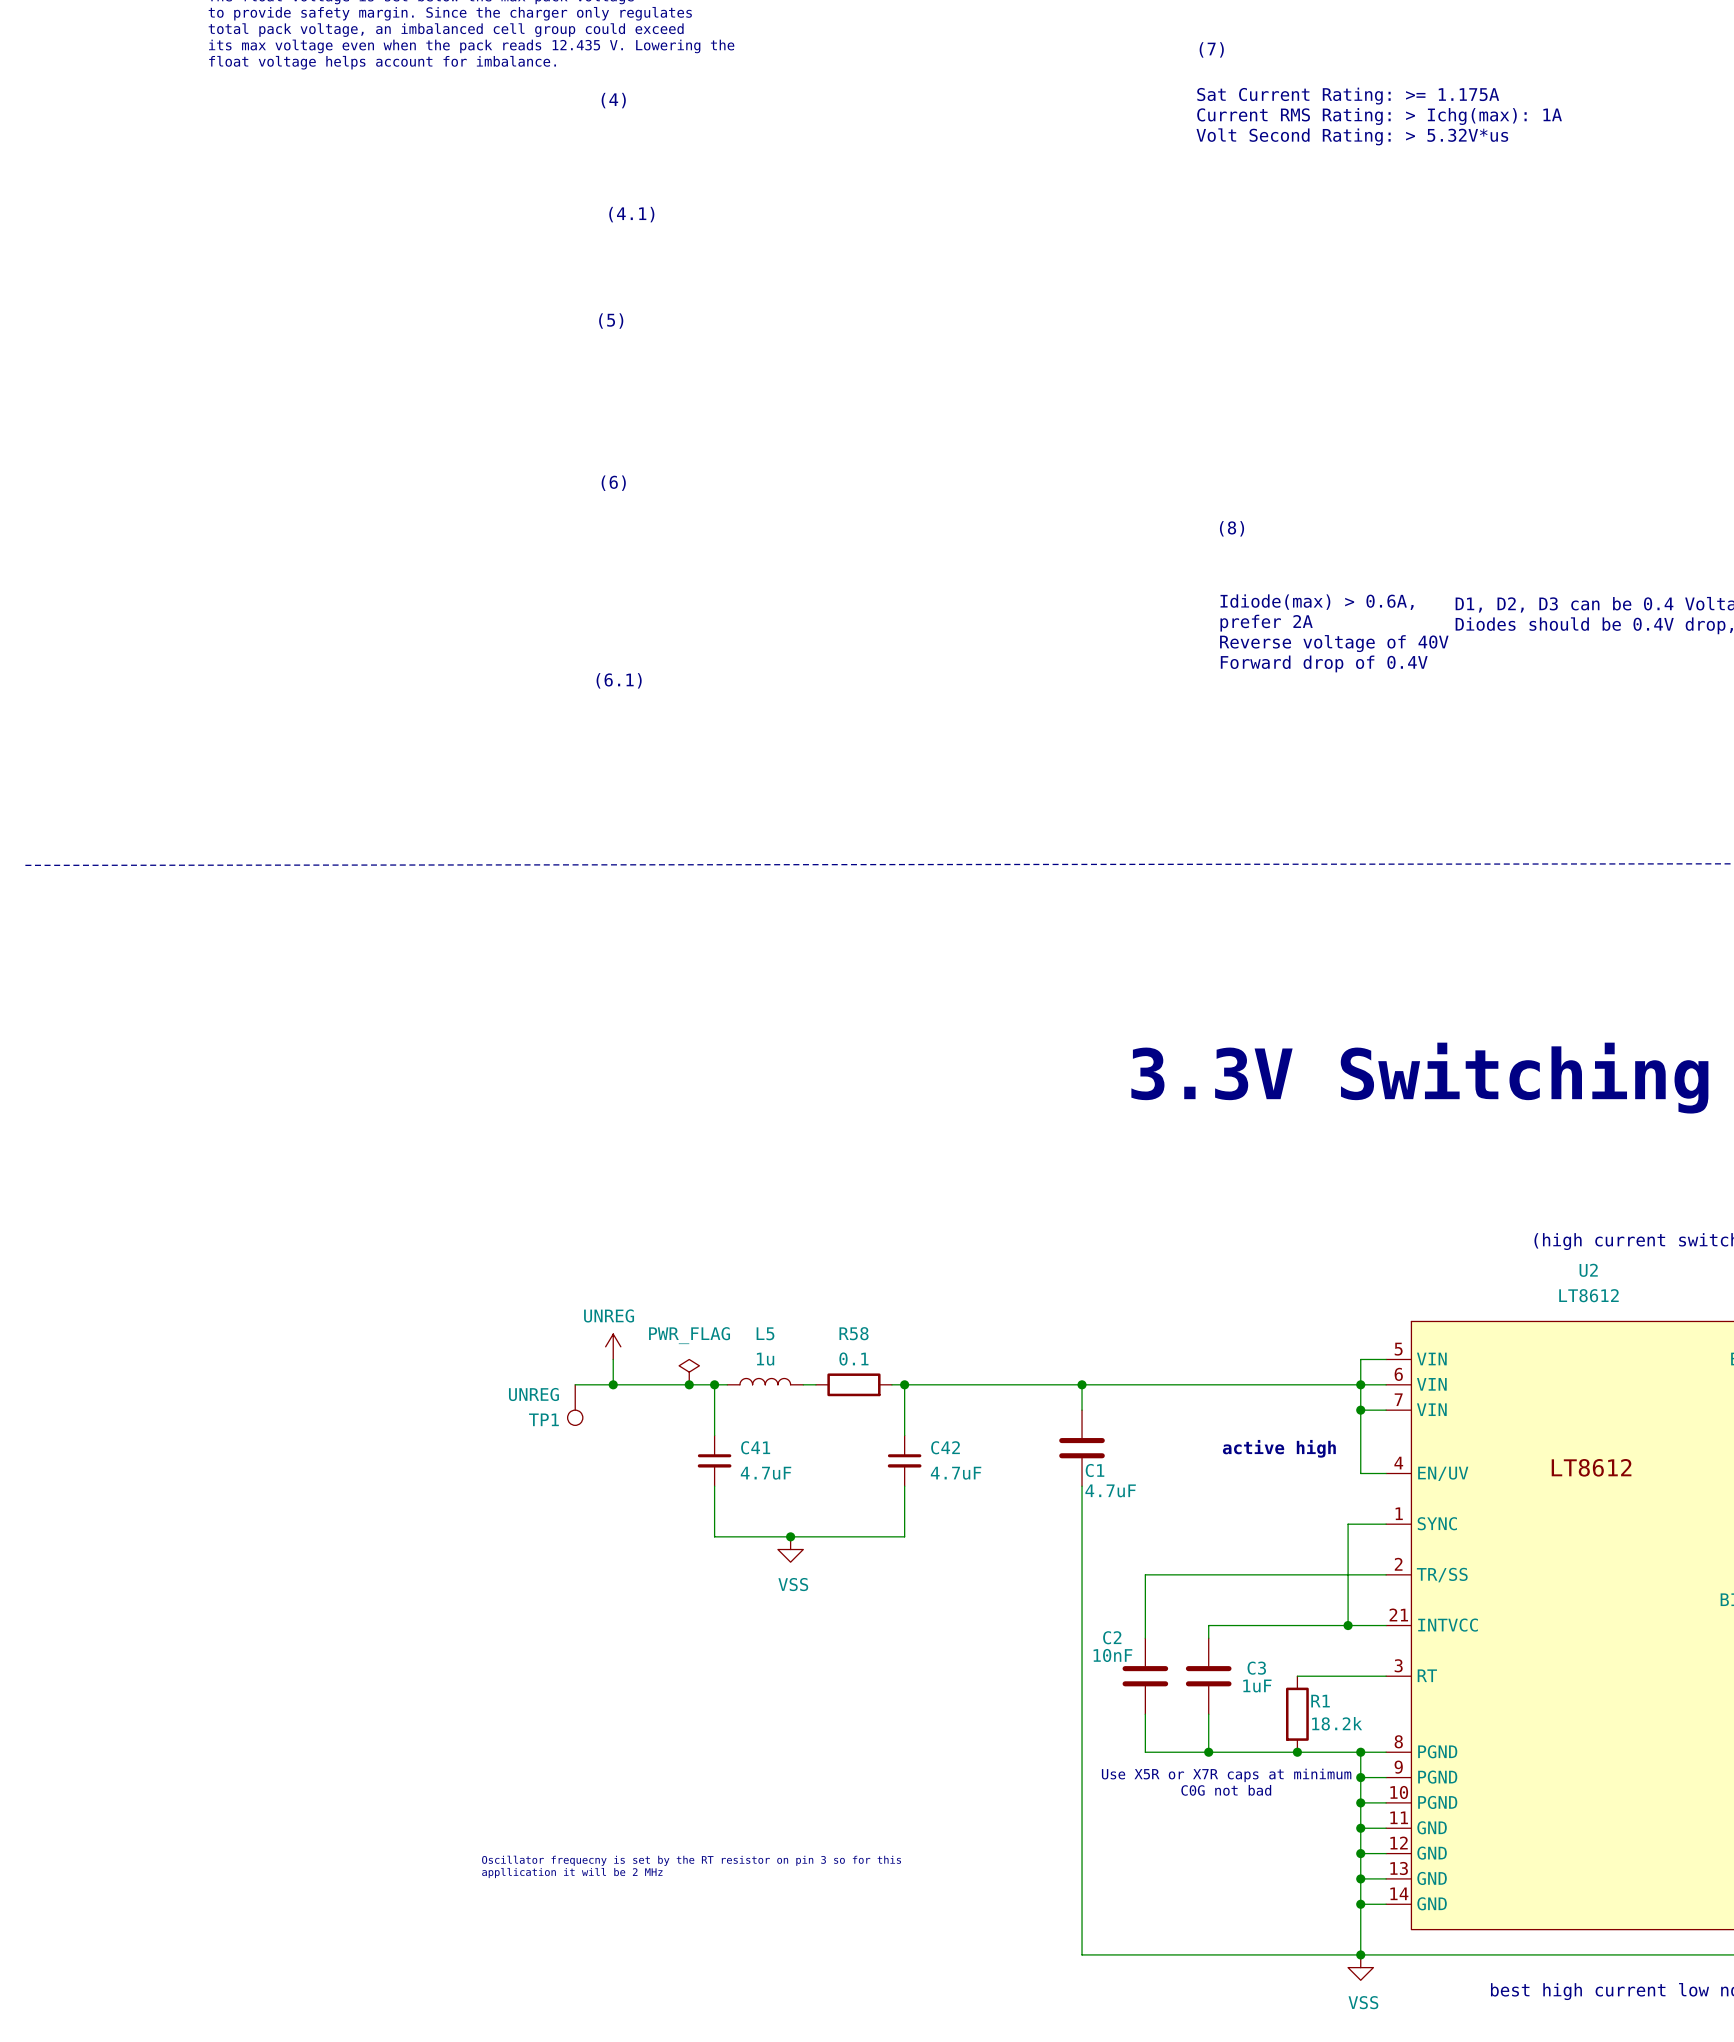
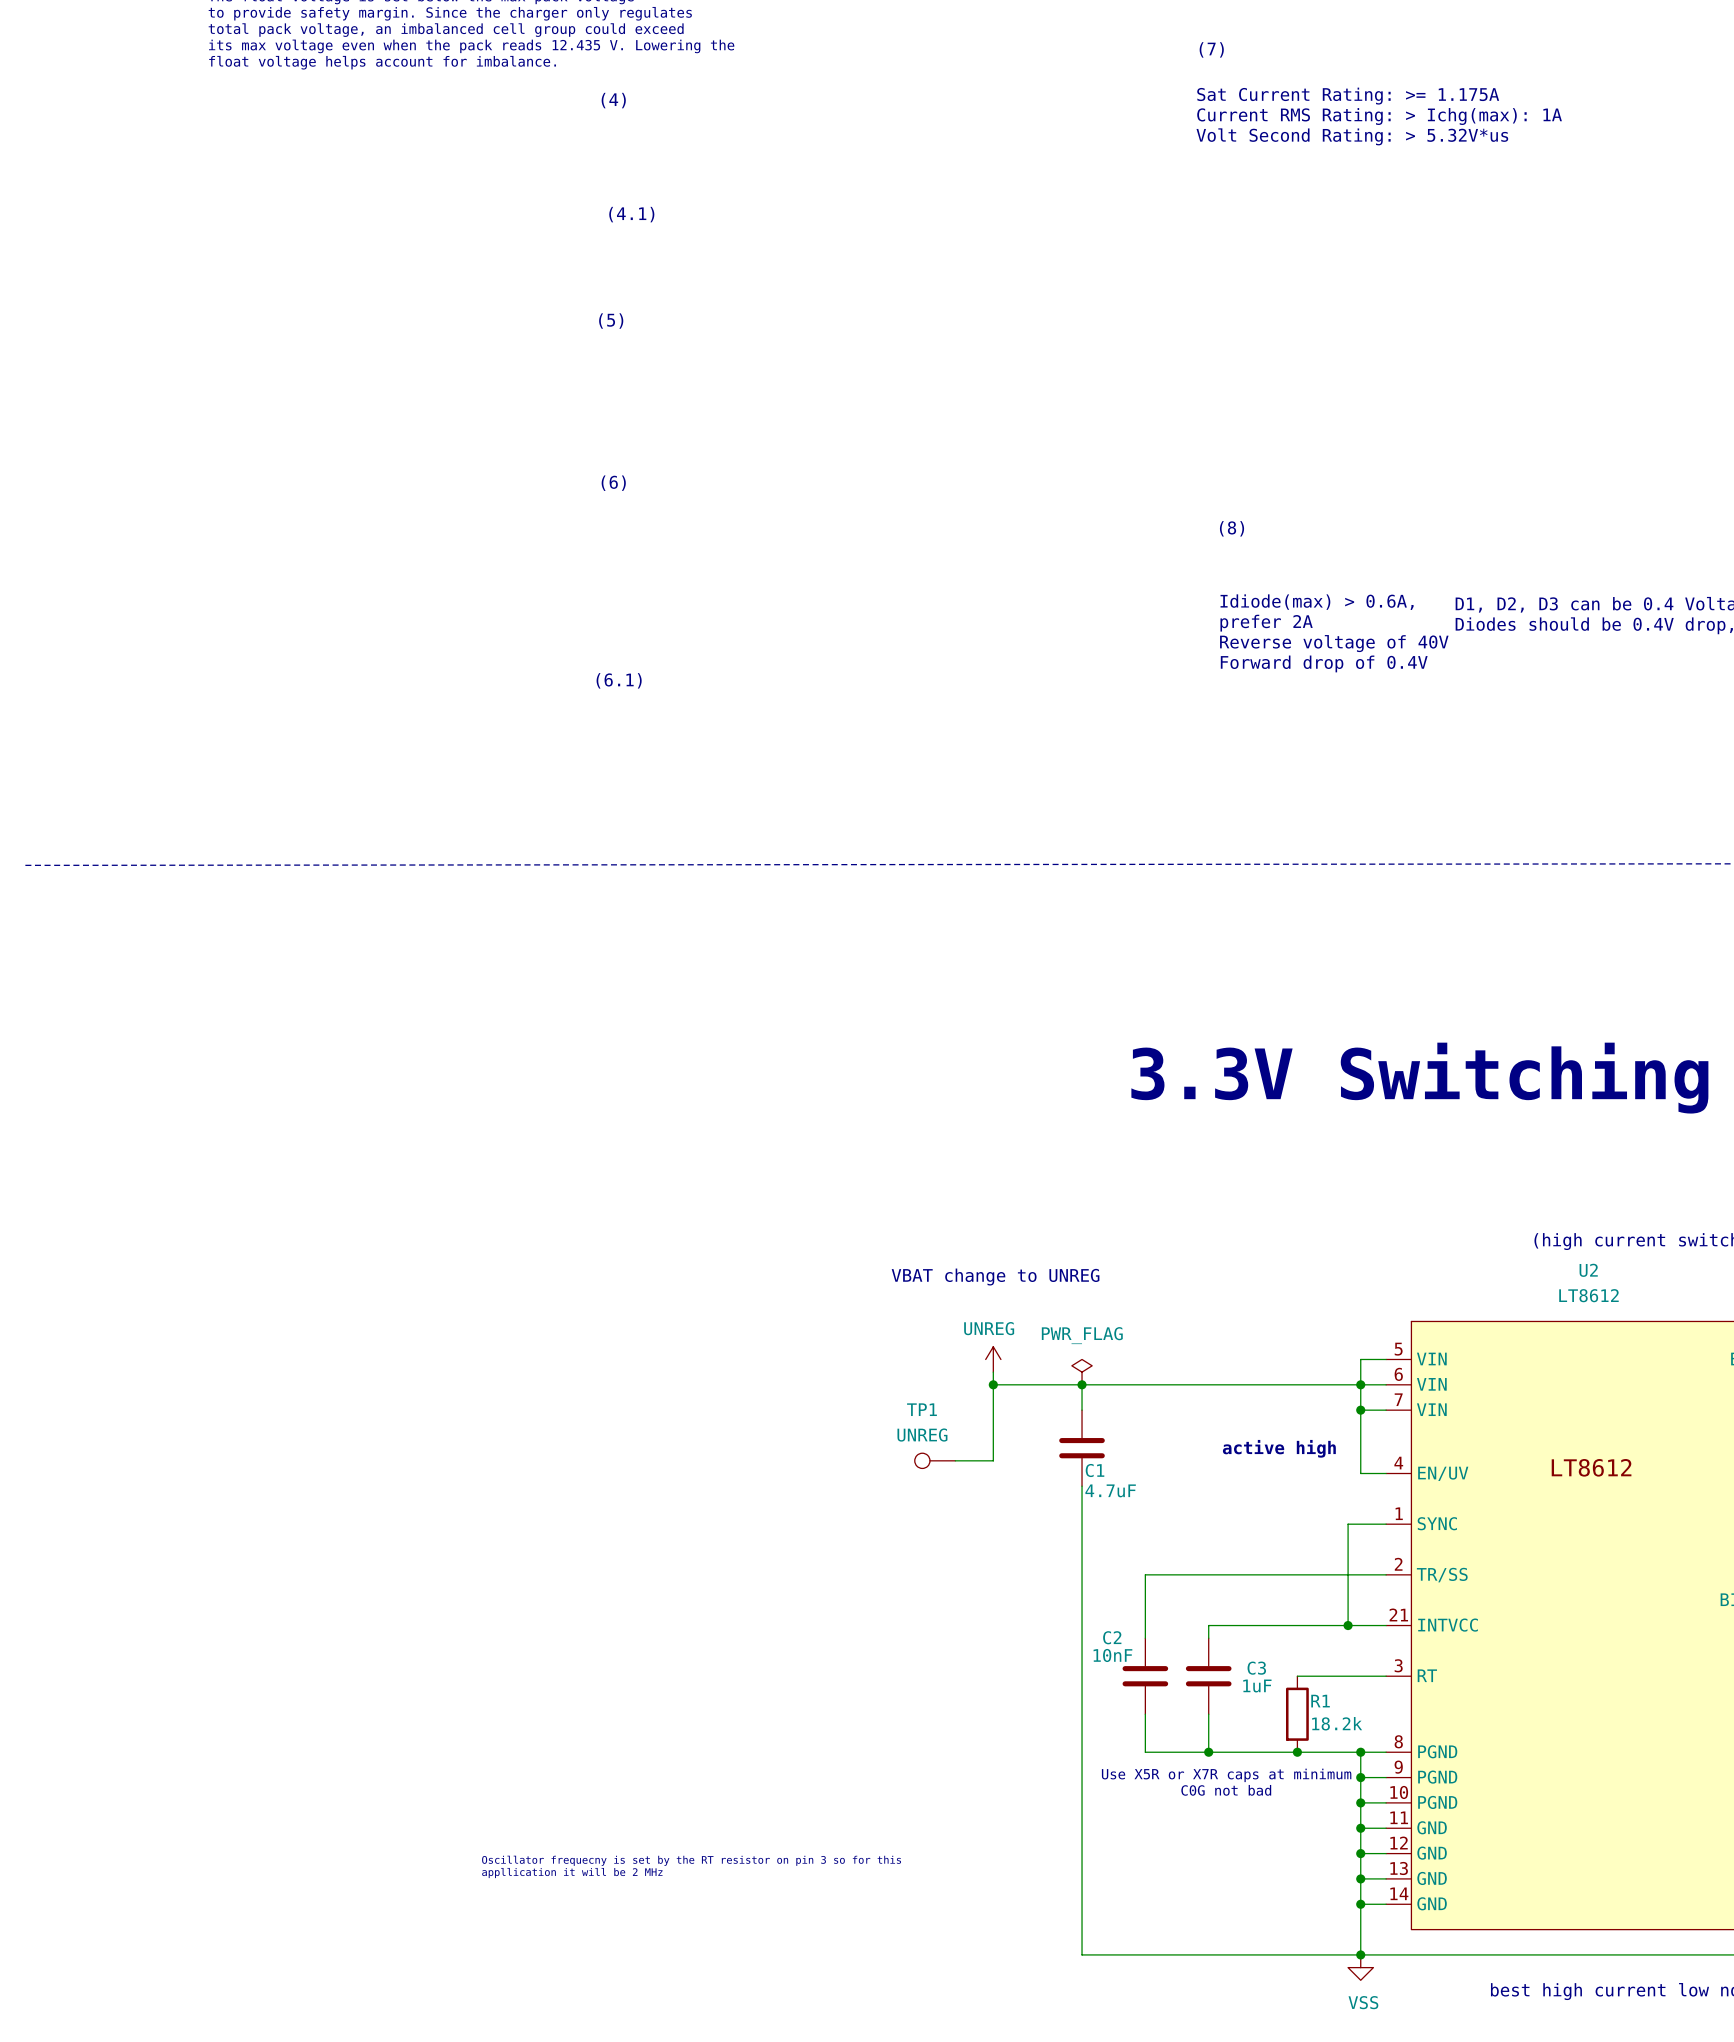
text: none -> VBAT change to UNREG (995, 1277)
power symbol: UNREG (613, 1346) -> none
wire: (613, 1359) (613, 1384) -> none
power symbol: none -> UNREG (993, 1359)
power symbol: PWR_FLAG (689, 1372) -> none
wire: none -> (993, 1372) (993, 1460) (955, 1460)
power symbol: none -> PWR_FLAG (1082, 1372)
L5: 1u (765, 1381) -> none
wire: (575, 1384) (727, 1384) -> none
junction: (613, 1384) -> none
junction: (689, 1384) -> none
wire: (714, 1384) (714, 1435) -> none
junction: (714, 1384) -> none
wire: (803, 1384) (815, 1384) -> none
R58: 0.1 (853, 1384) -> none
wire: (891, 1384) (993, 1384) -> none
wire: (904, 1384) (904, 1435) -> none
junction: (904, 1384) -> none
junction: none -> (993, 1384)
TP1 value position: UNREG (533, 1394) -> UNREG (922, 1435)
TP1 position: (575, 1405) -> (935, 1460)
TP1 rotation: 0° (575, 1417) -> 90° clockwise (922, 1460)
C41: 4.7uF (714, 1460) -> none
C42: 4.7uF (904, 1460) -> none
wire: (714, 1486) (714, 1536) (904, 1536) (904, 1486) -> none
junction: (790, 1536) -> none
power symbol: VSS (790, 1549) -> none

